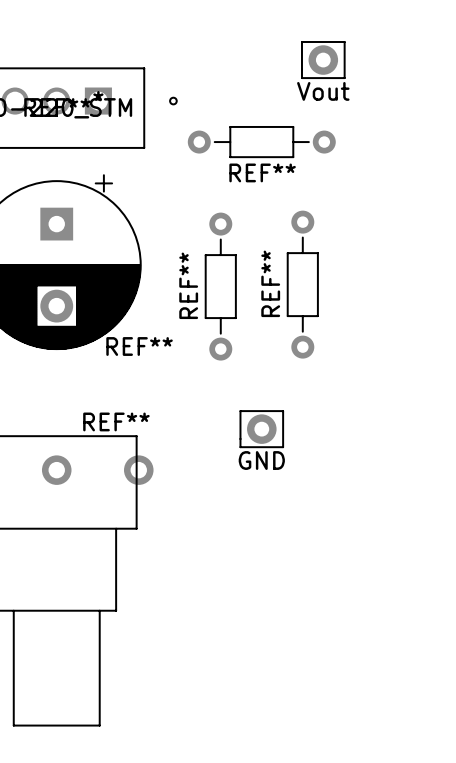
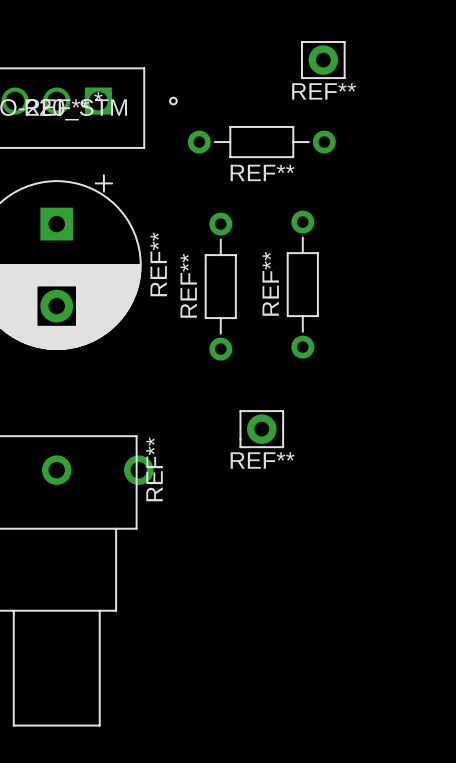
Vout name: Vout (323, 91) -> REF** (324, 91)
REF** name rotation: 0° (139, 346) -> 90° counterclockwise (158, 264)
REF** name rotation: 0° (116, 421) -> 90° counterclockwise (154, 469)
GND name: GND (261, 460) -> REF** (262, 460)

